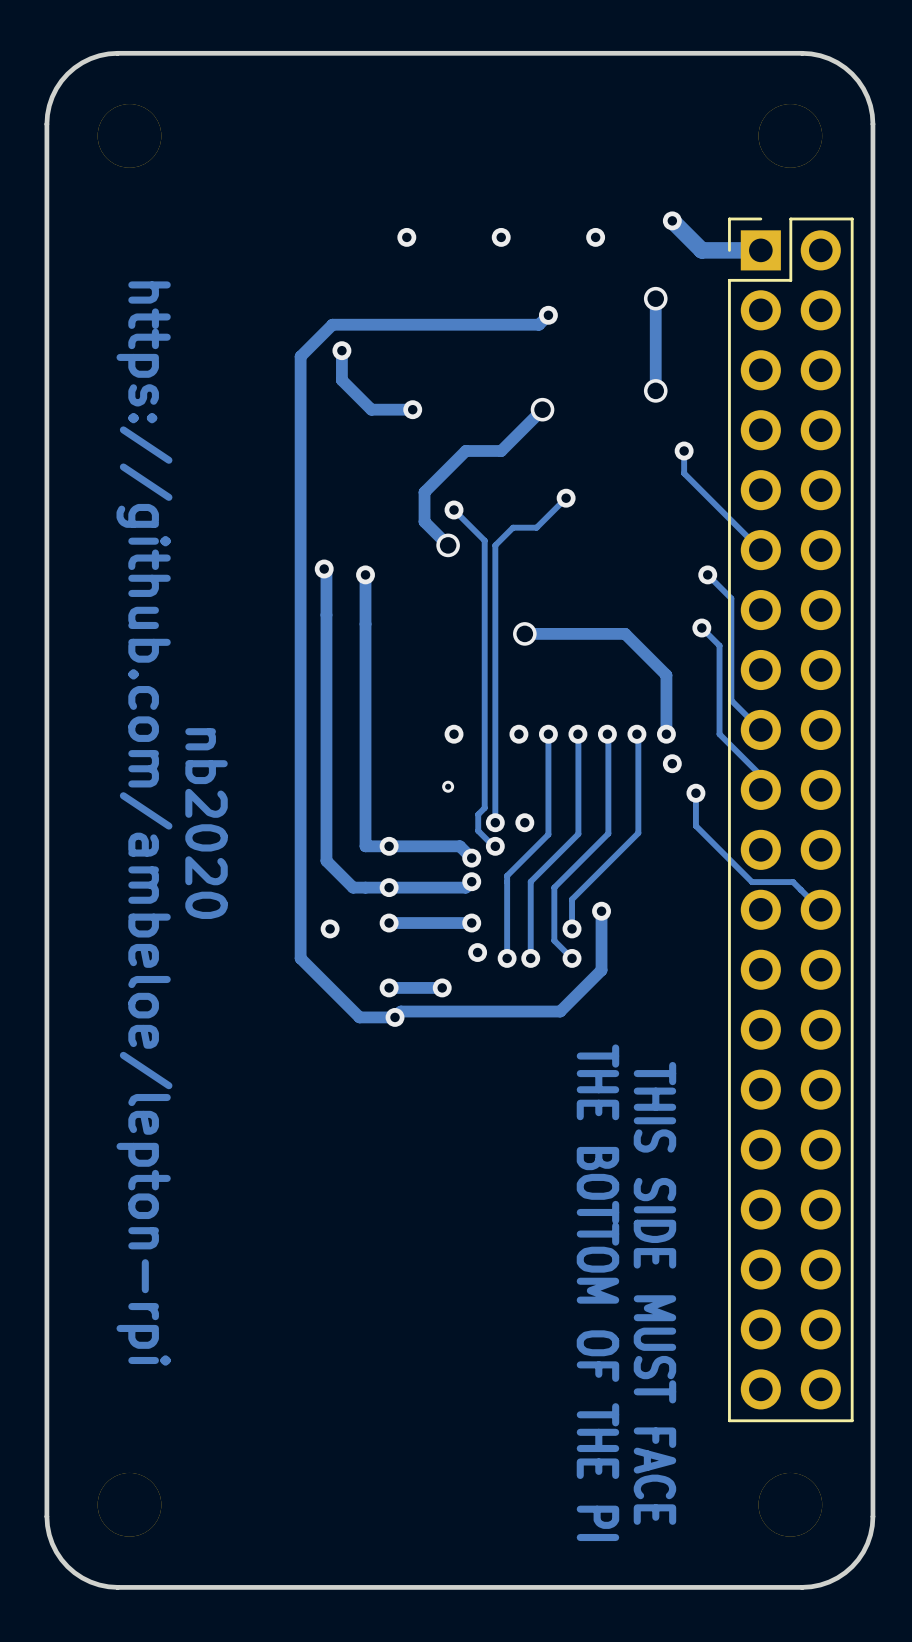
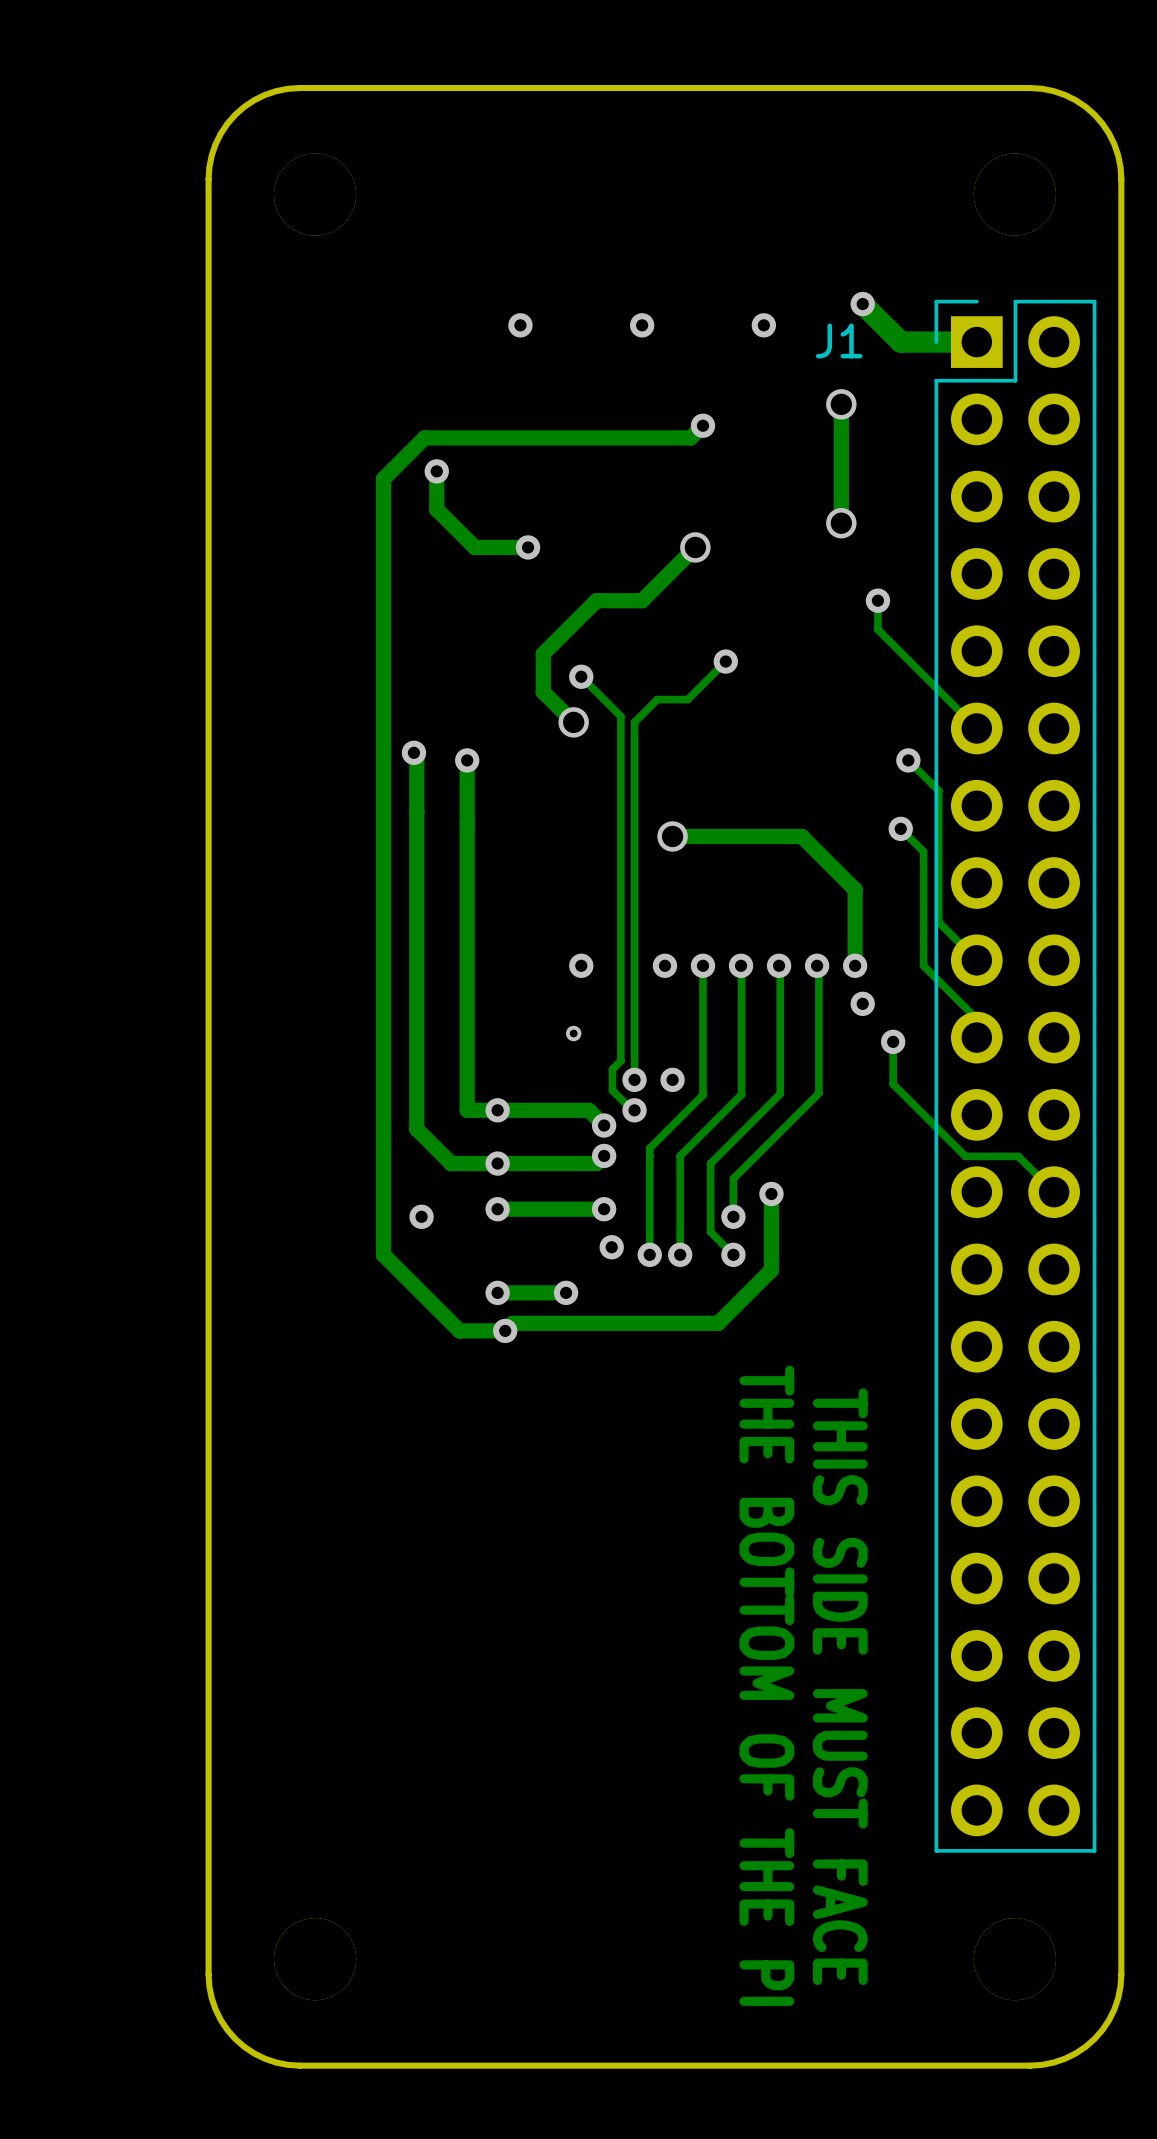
part: (459, 820) -> none
J1: none -> (664, 1076)
text: https://github.com/ambeloe/lepton-rpi (144, 823) -> none
text: nb2020 (206, 823) -> none

